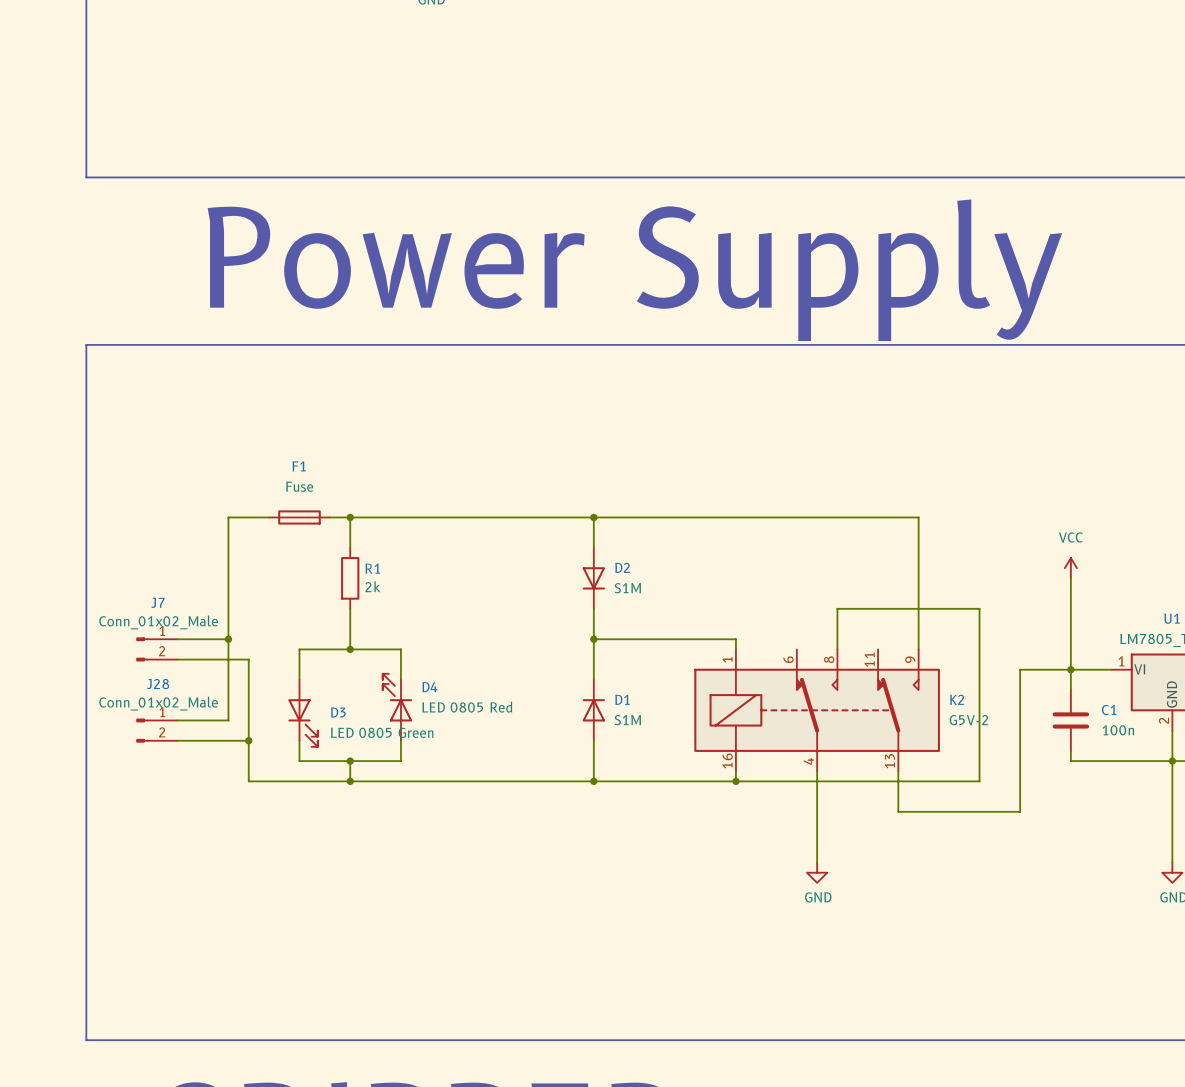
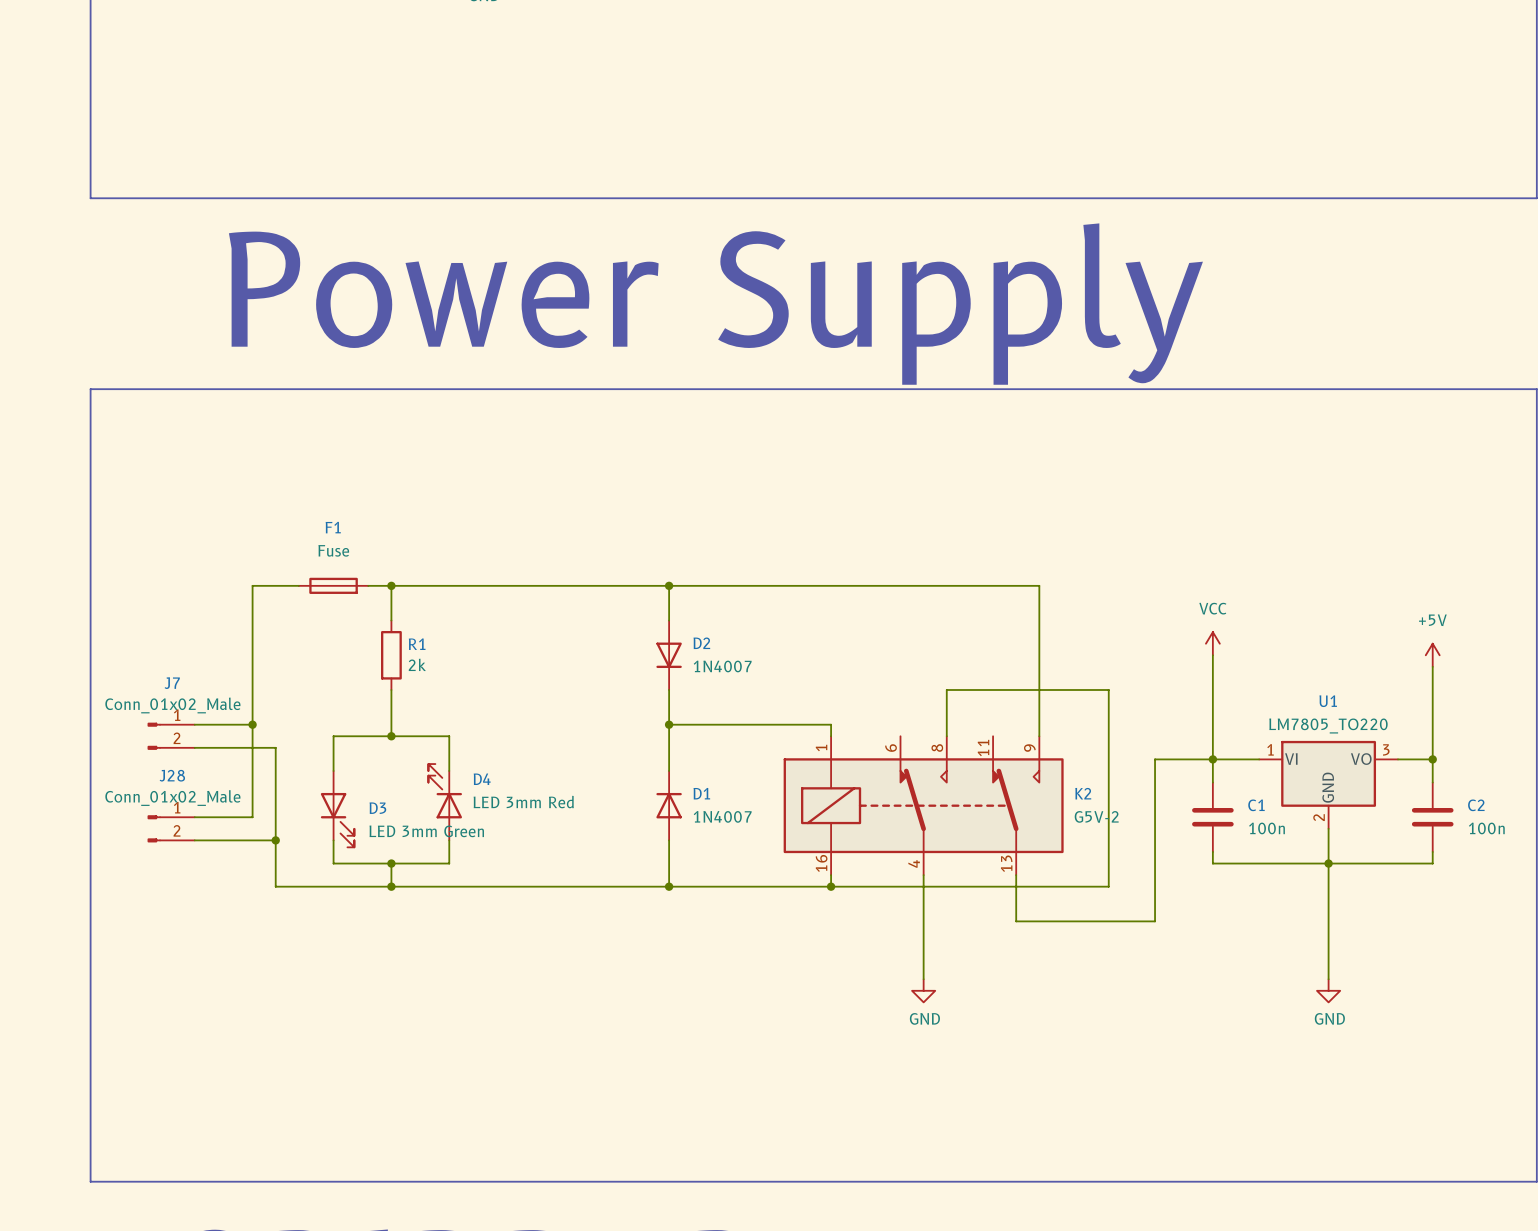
D2 value: S1M (627, 588) -> 1N4007 (722, 666)
D4 value: LED 0805 Red (467, 707) -> LED 3mm Red (523, 802)
D1 value: S1M (627, 720) -> 1N4007 (722, 816)
D3 value: LED 0805 Green (382, 732) -> LED 3mm Green (426, 831)

